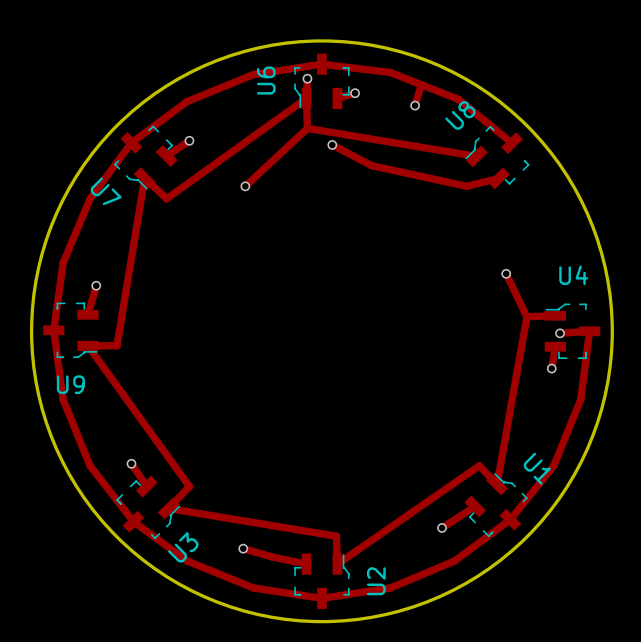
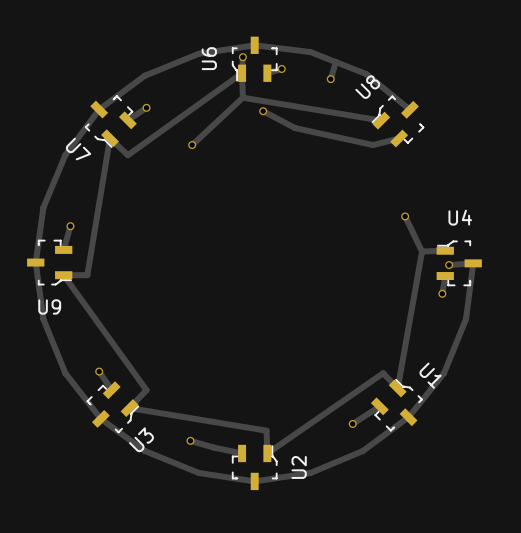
round board edge: [29, 39, 614, 624] -> none

